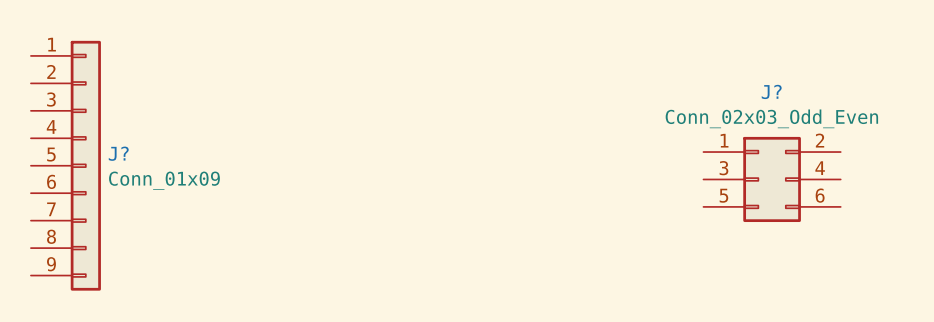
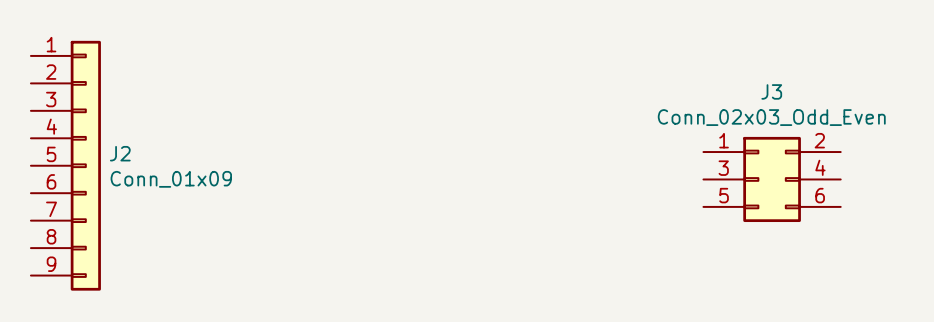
J? name: J? (771, 91) -> J3 (771, 91)
J? name: J? (118, 153) -> J2 (120, 153)

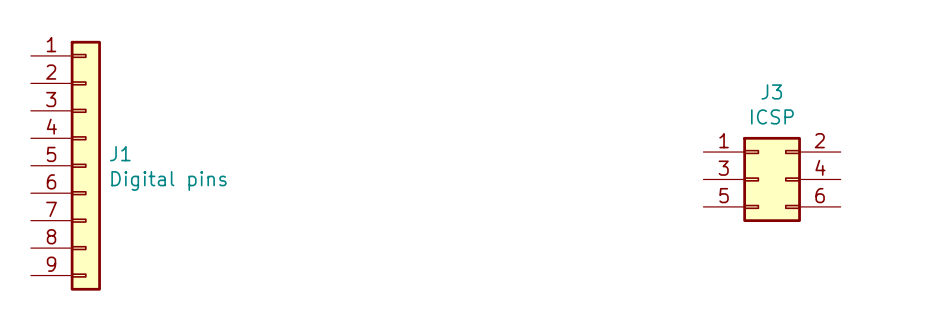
J3 value: Conn_02x03_Odd_Even (771, 117) -> ICSP (772, 116)
J2 name: J2 (120, 153) -> J1 (120, 153)
J2 value: Conn_01x09 (171, 179) -> Digital pins (169, 180)

